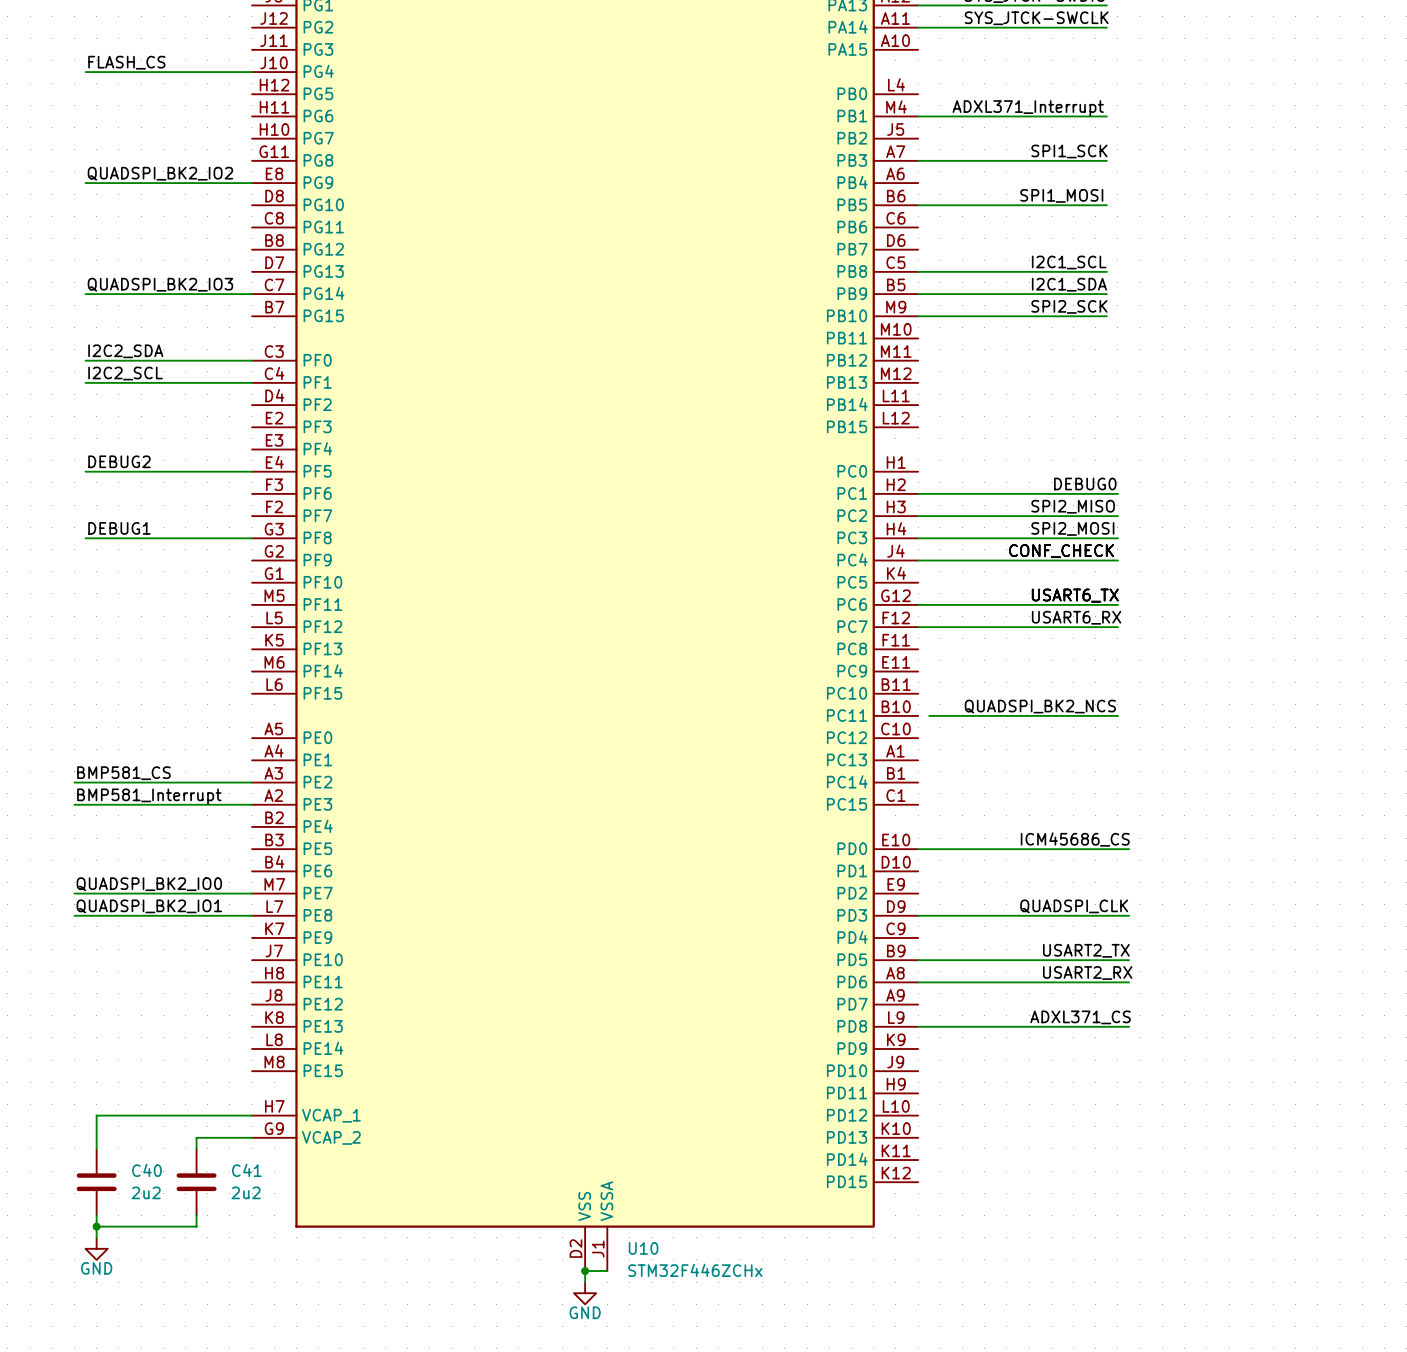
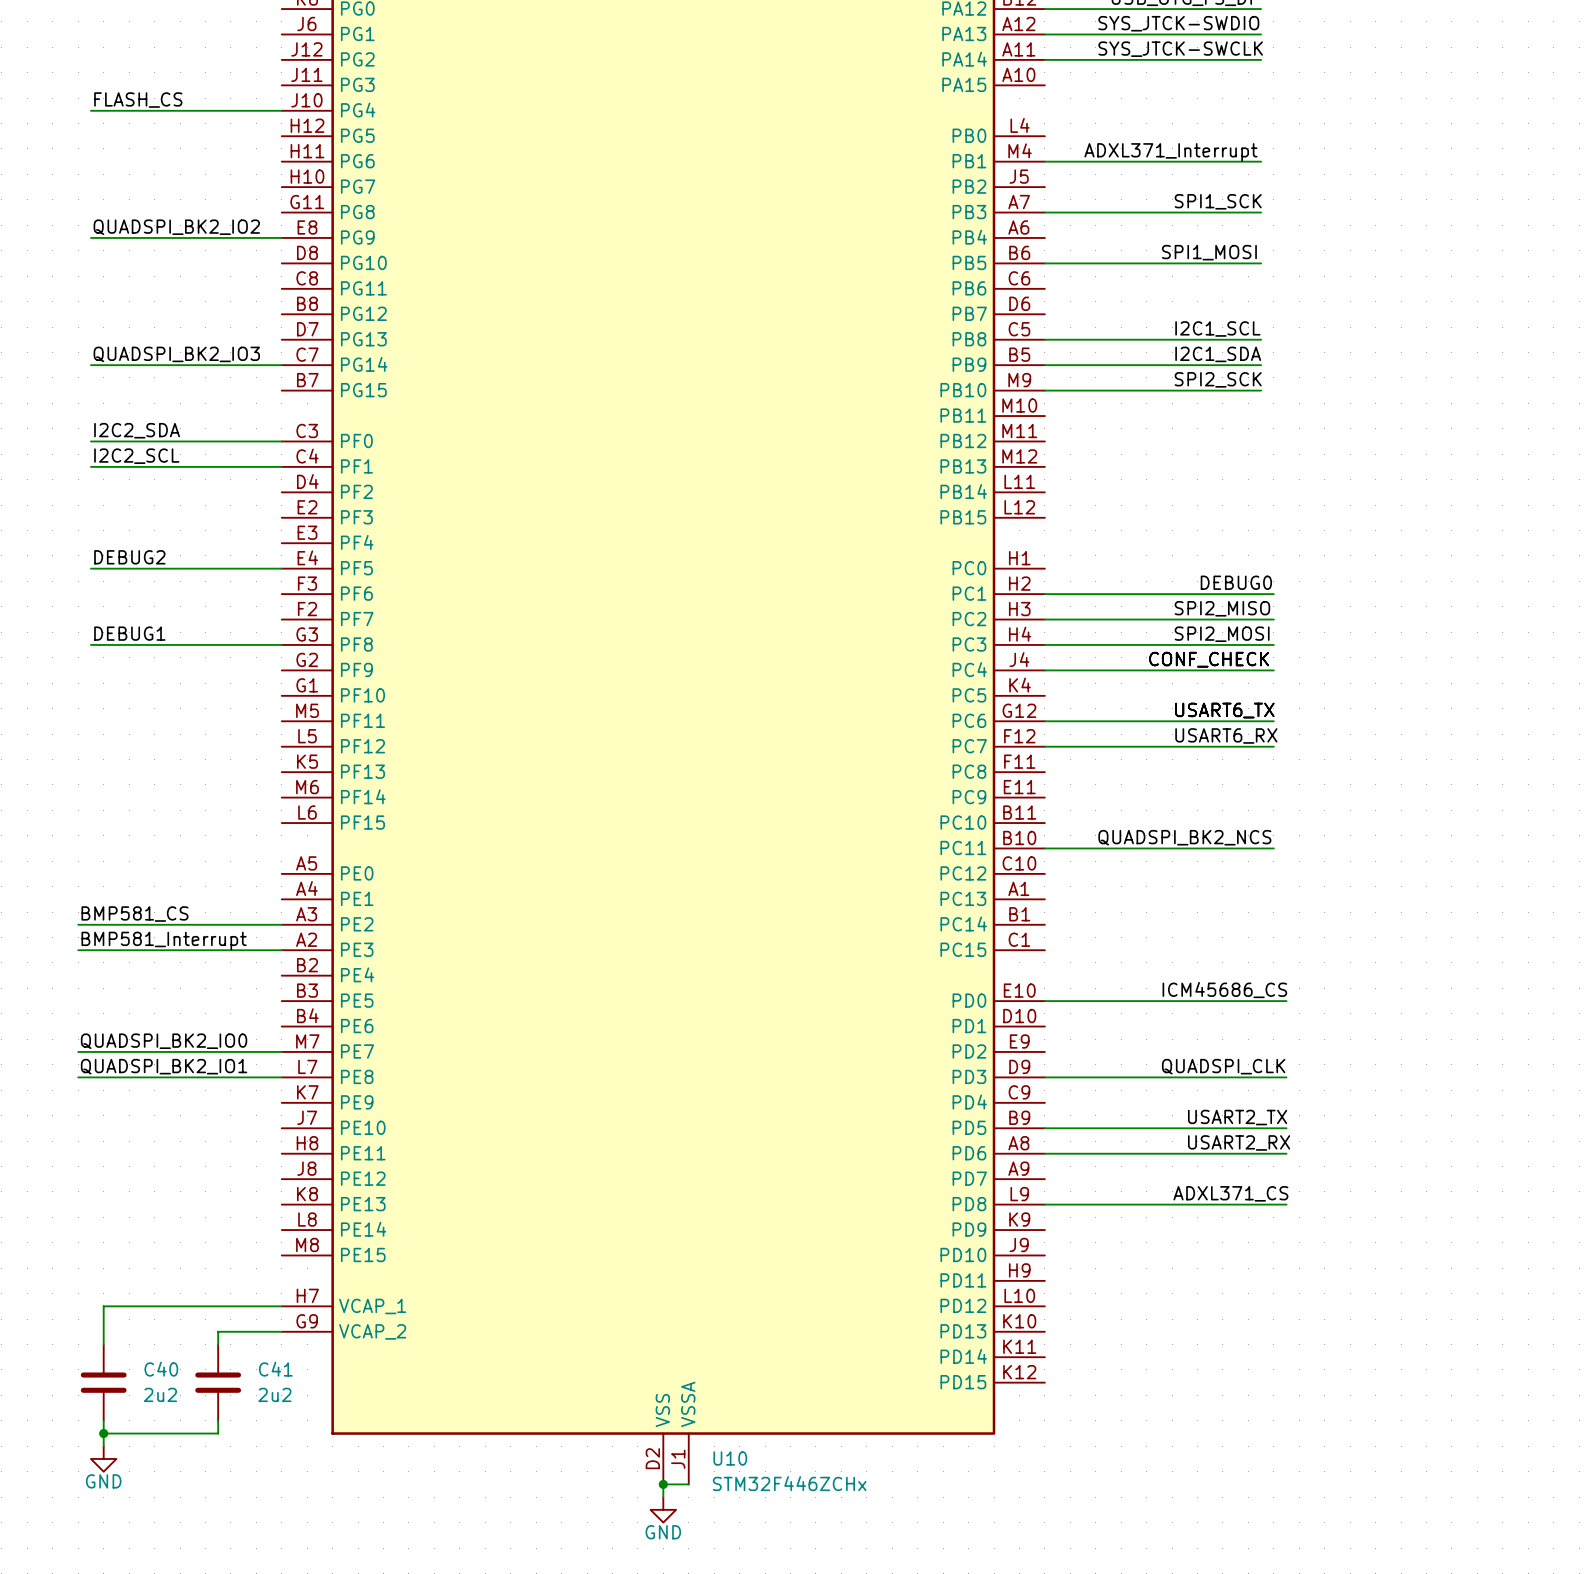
wire: none -> (1044, 848) (1057, 848)

